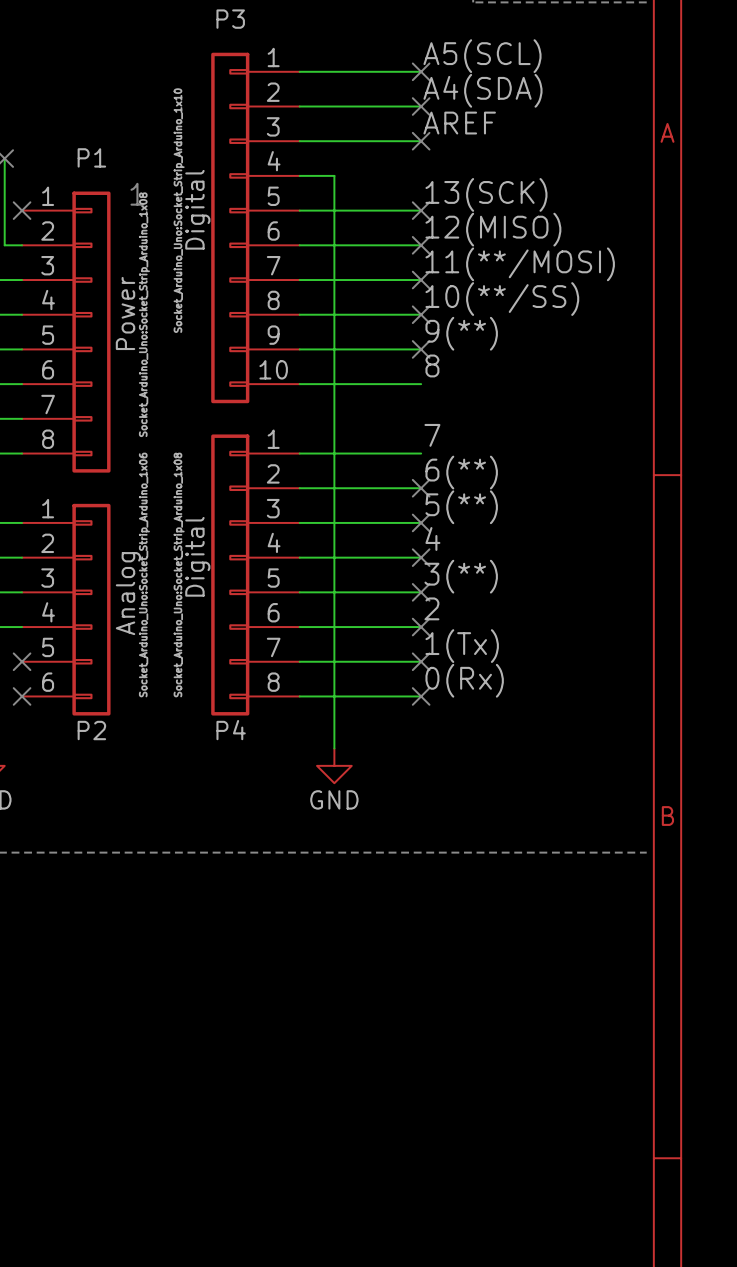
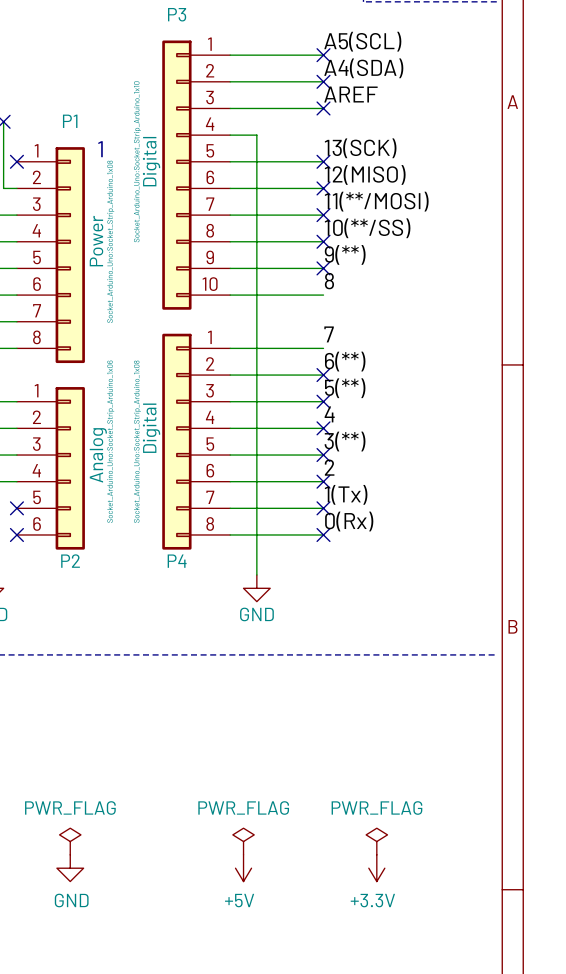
power symbol: none -> PWR_FLAG (70, 841)
power symbol: none -> PWR_FLAG (243, 841)
power symbol: none -> PWR_FLAG (376, 841)
power symbol: none -> GND (70, 868)
power symbol: none -> +5V (243, 868)
power symbol: none -> +3.3V (376, 868)

